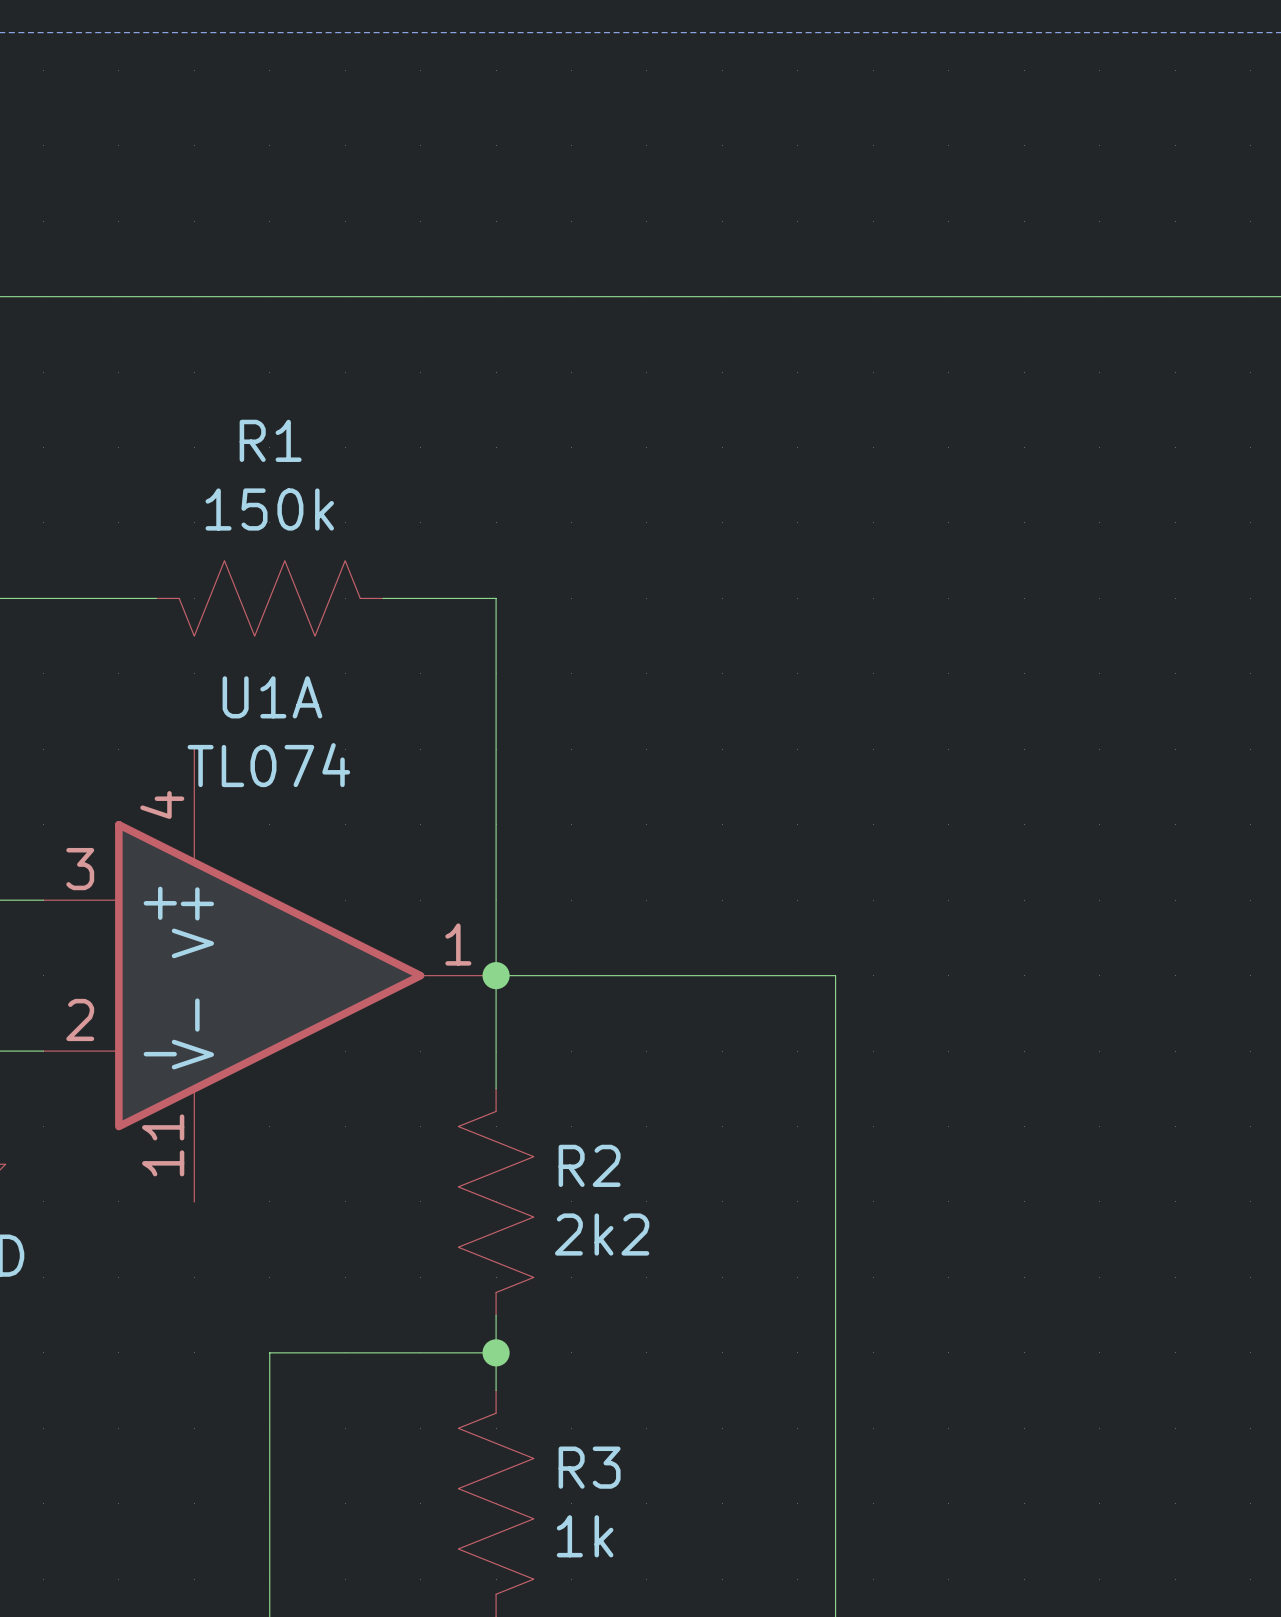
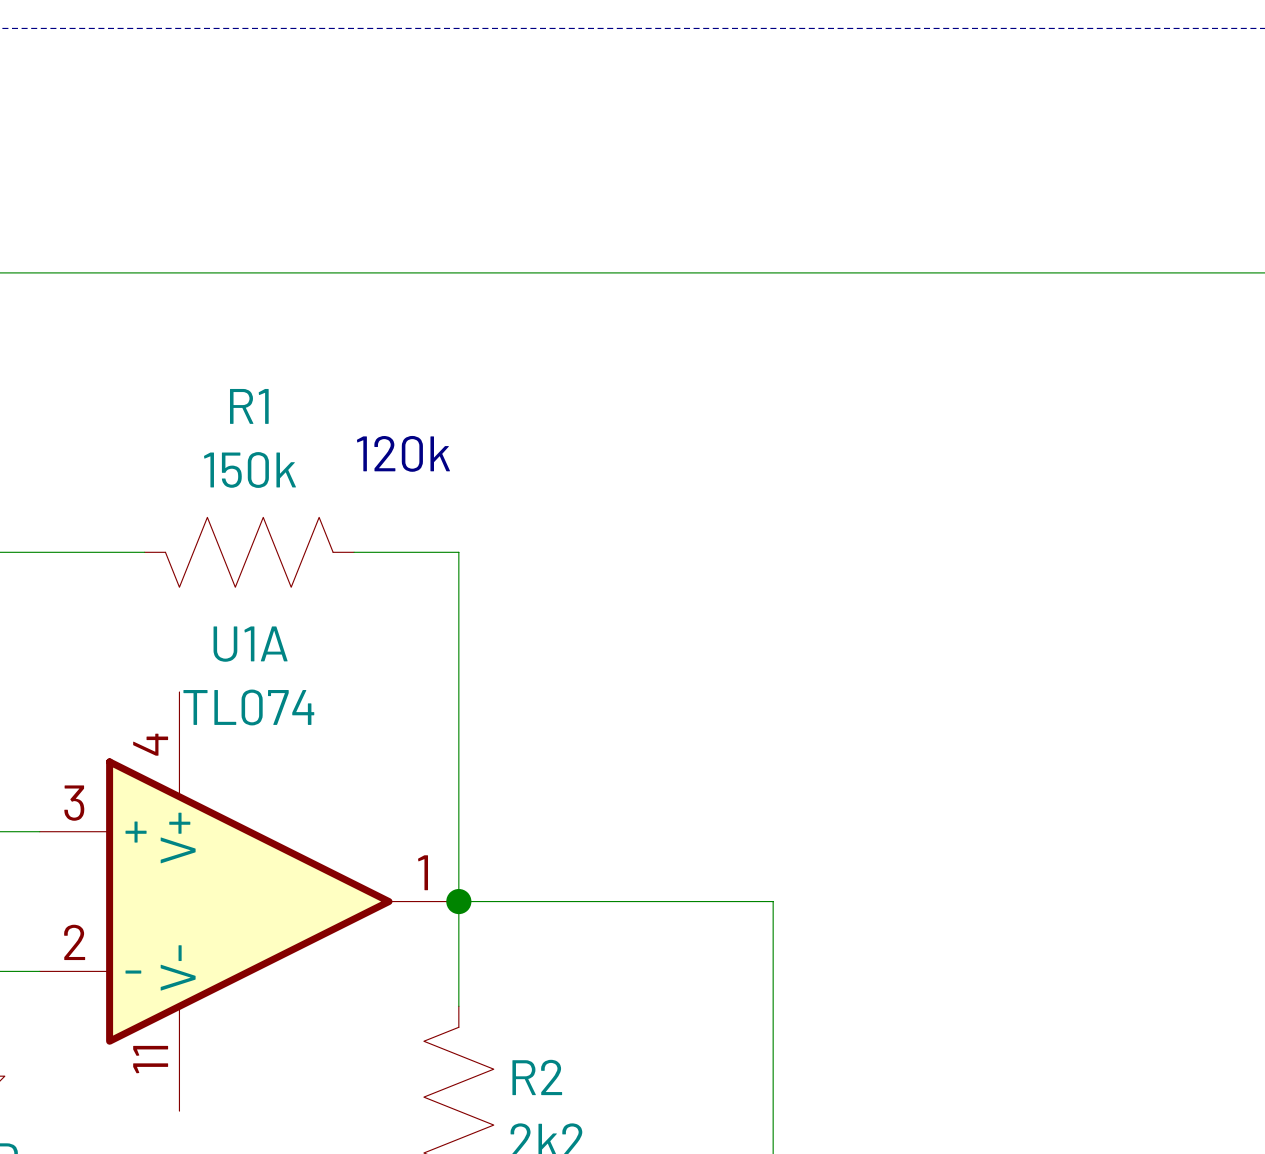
text: none -> 120k (403, 453)

